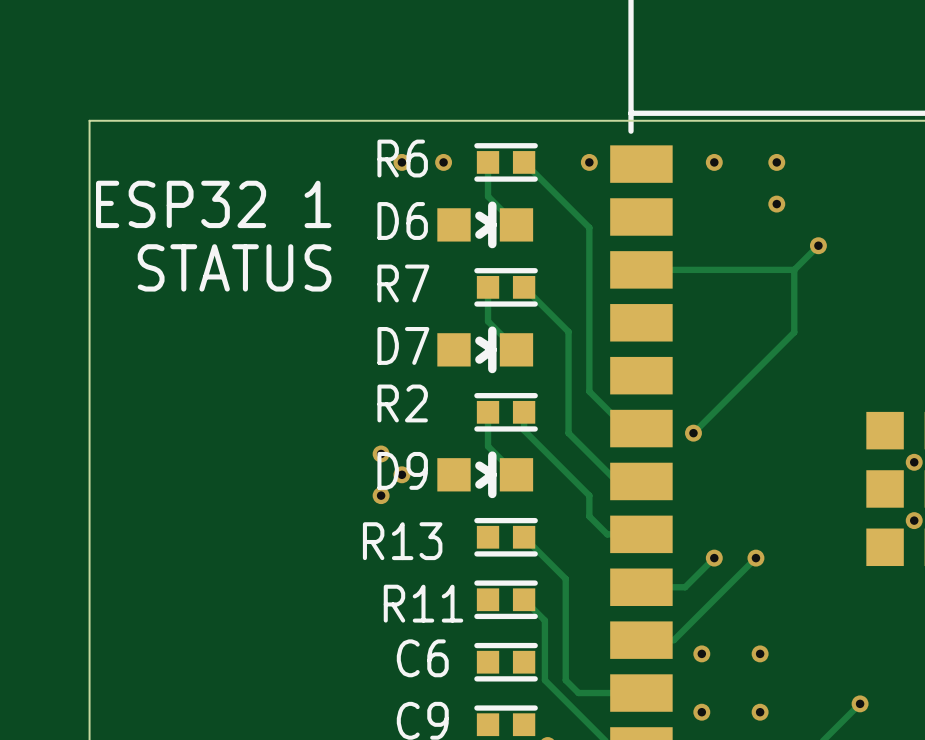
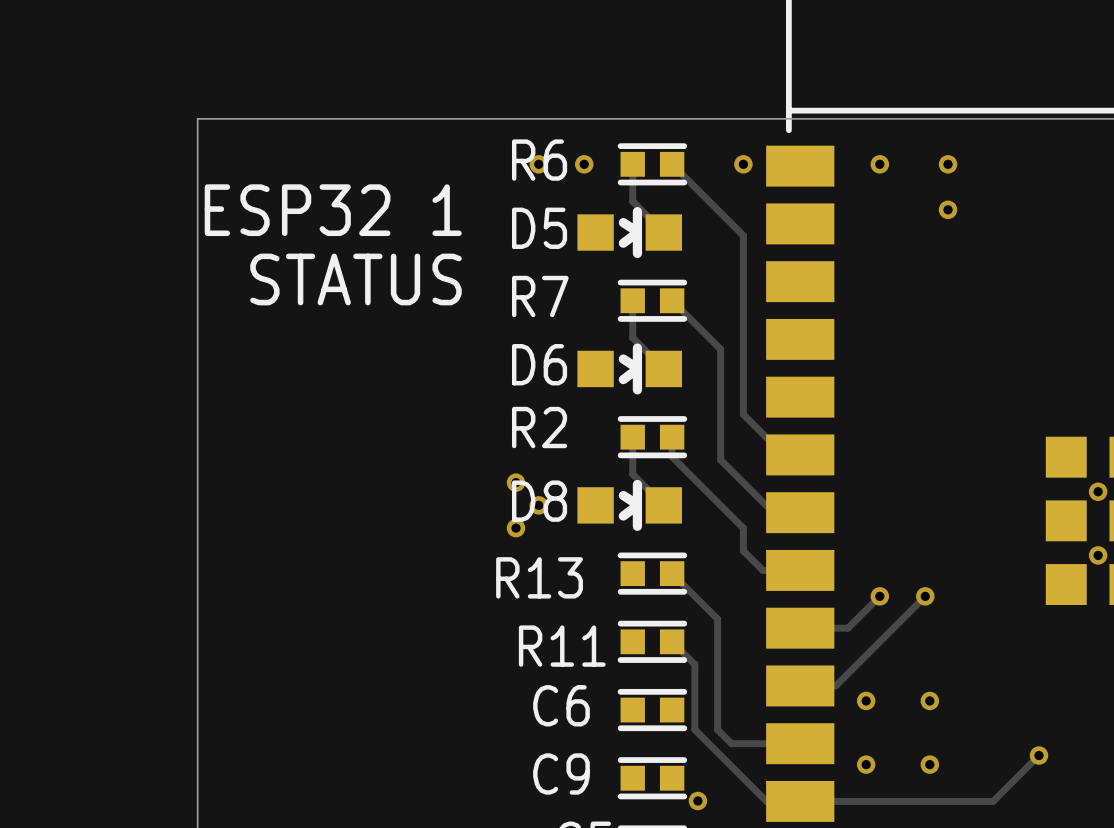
D6 name: D6 (402, 221) -> D5 (539, 228)
track: (818, 245) (794, 269) -> none
via: (818, 245) -> none
track: (794, 269) (641, 269) -> none
track: (794, 269) (794, 332) (693, 433) -> none
D7 name: D7 (403, 345) -> D6 (539, 364)
via: (693, 433) -> none
D9 name: D9 (402, 470) -> D8 (539, 501)

